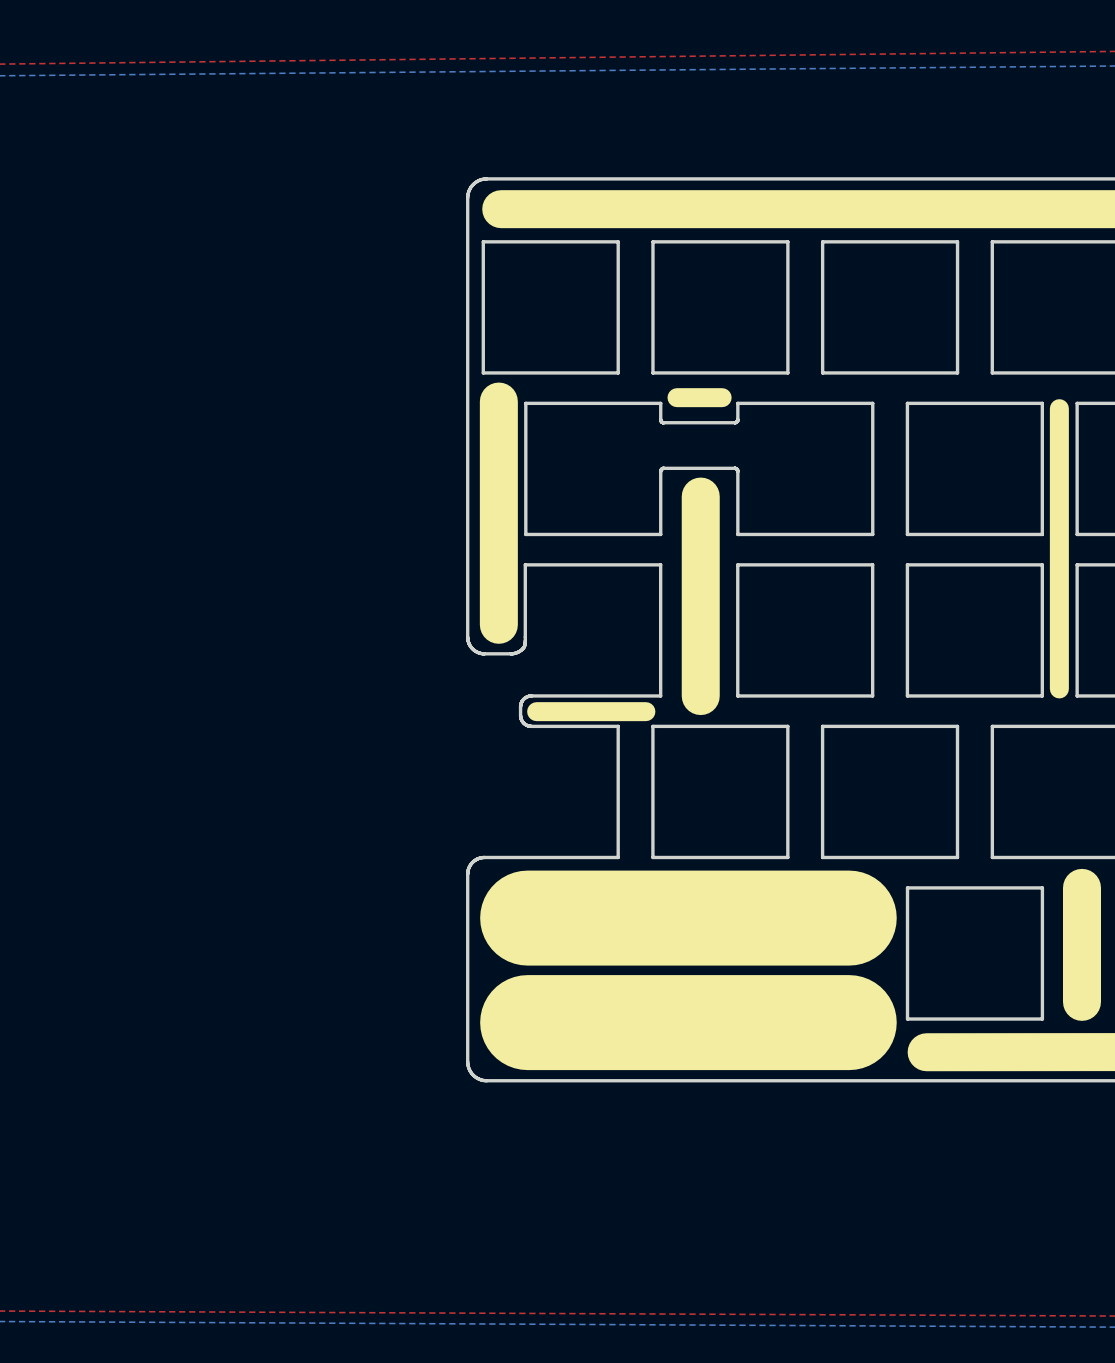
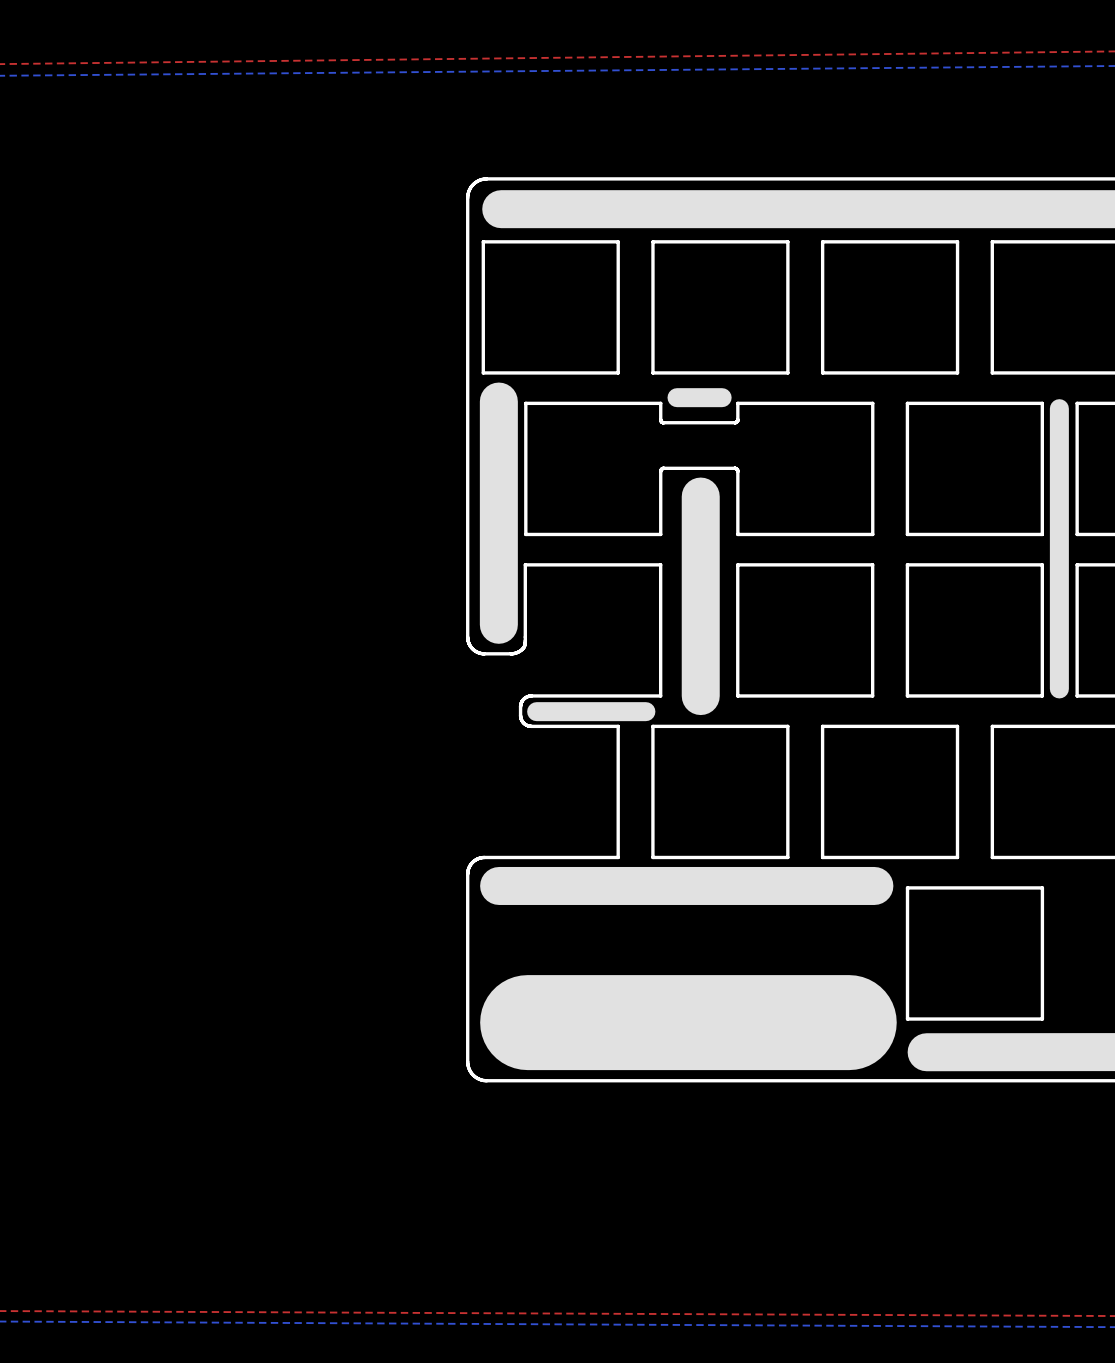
line: none -> (874, 885) (499, 885)
line: (1082, 887) (1082, 1001) -> none
line: (849, 918) (527, 918) -> none

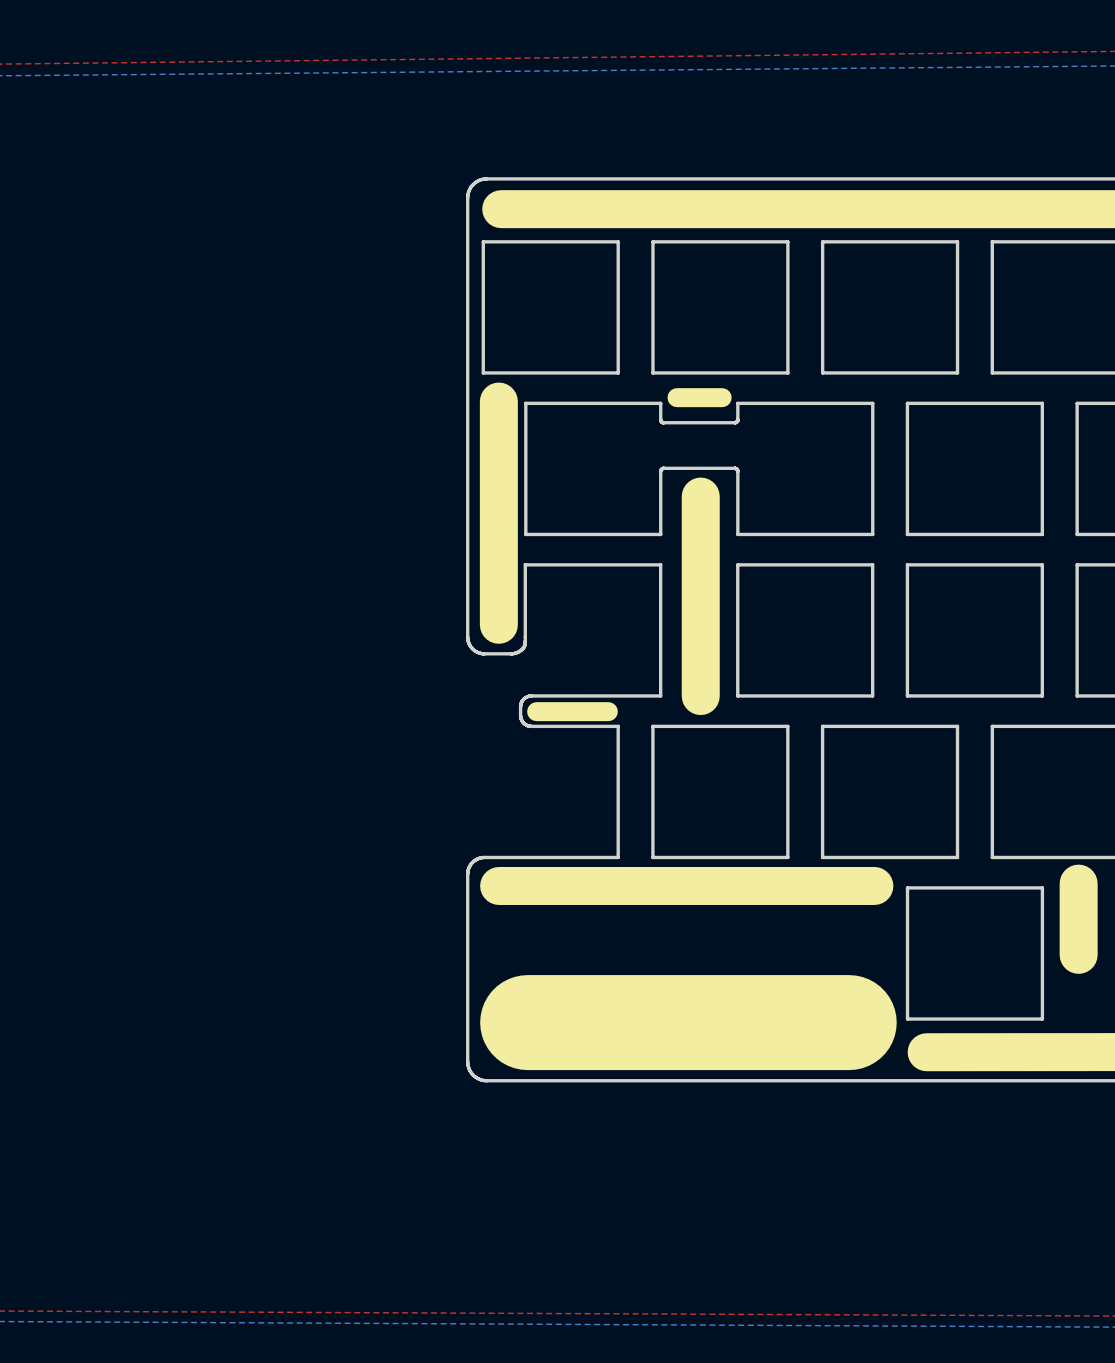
line: (1059, 408) (1059, 688) -> none
line: (645, 711) (608, 711) -> none
line: none -> (1078, 883) (1078, 954)

